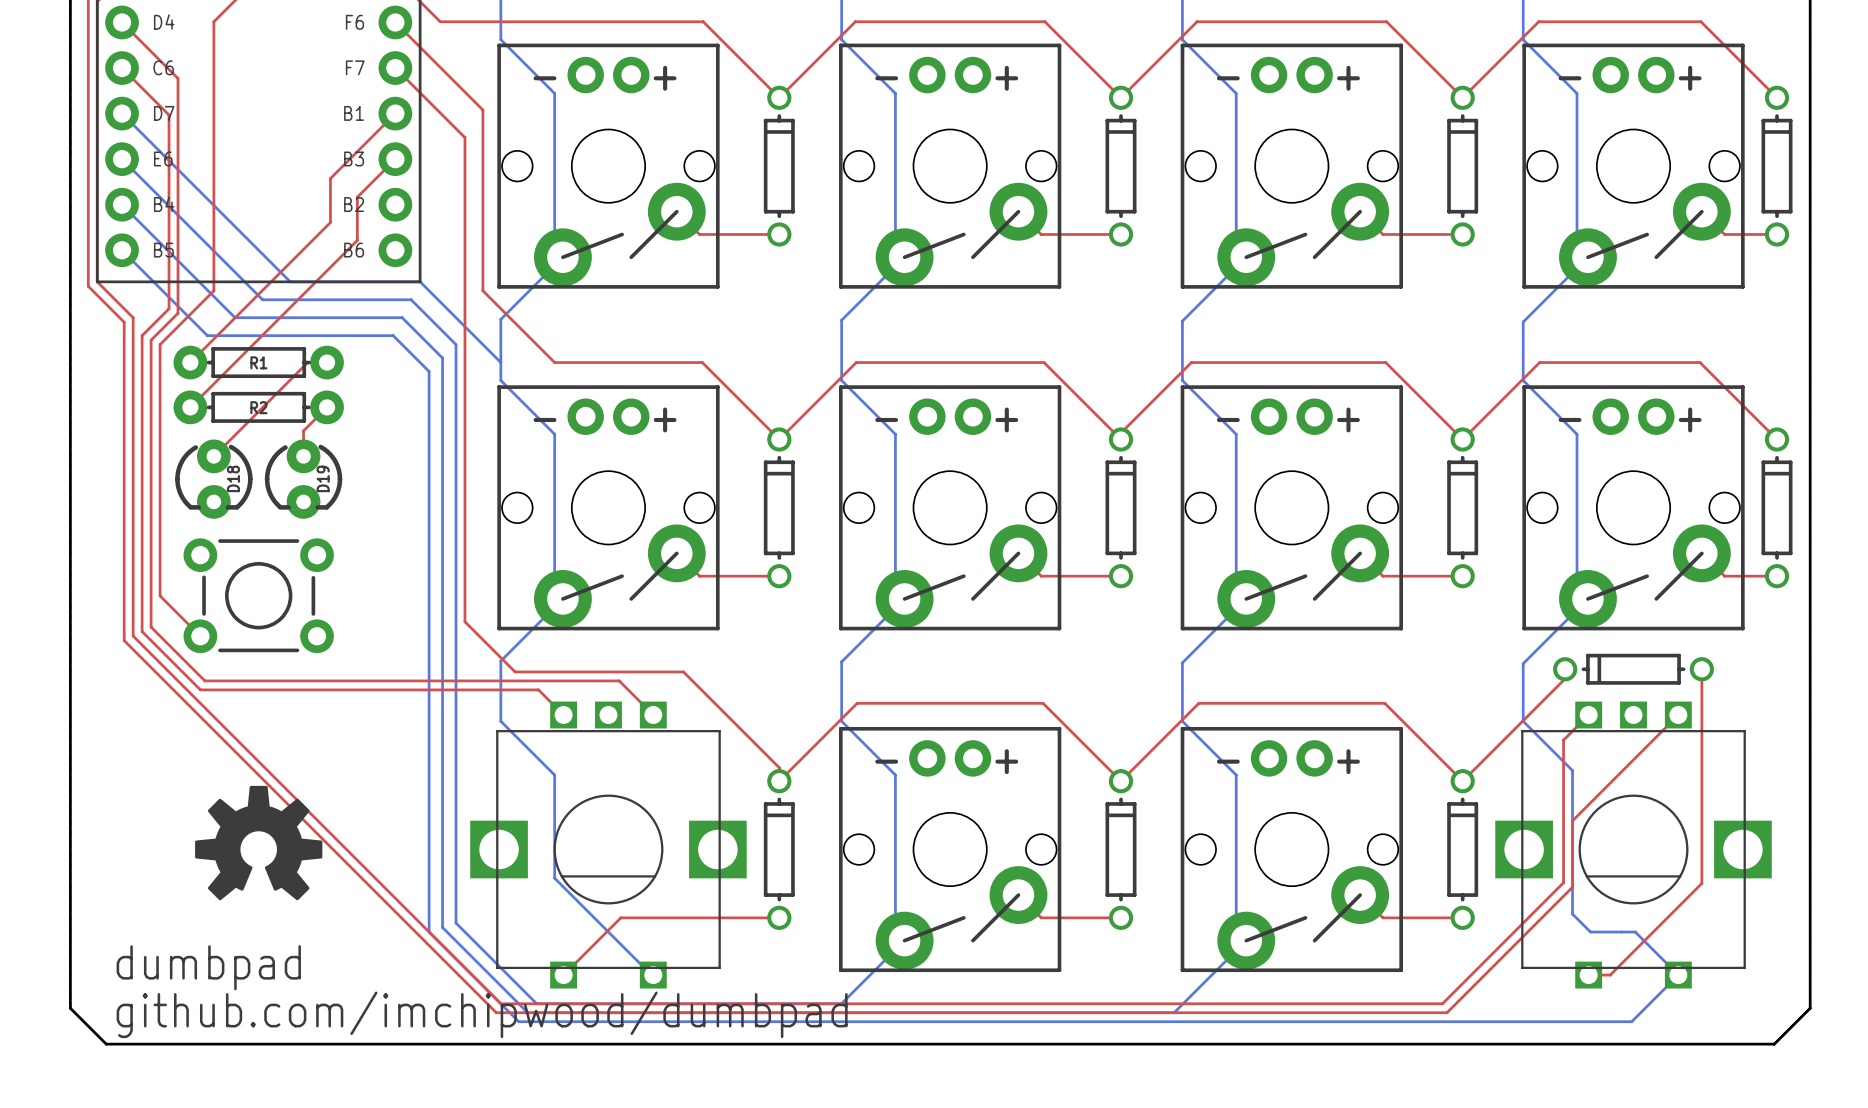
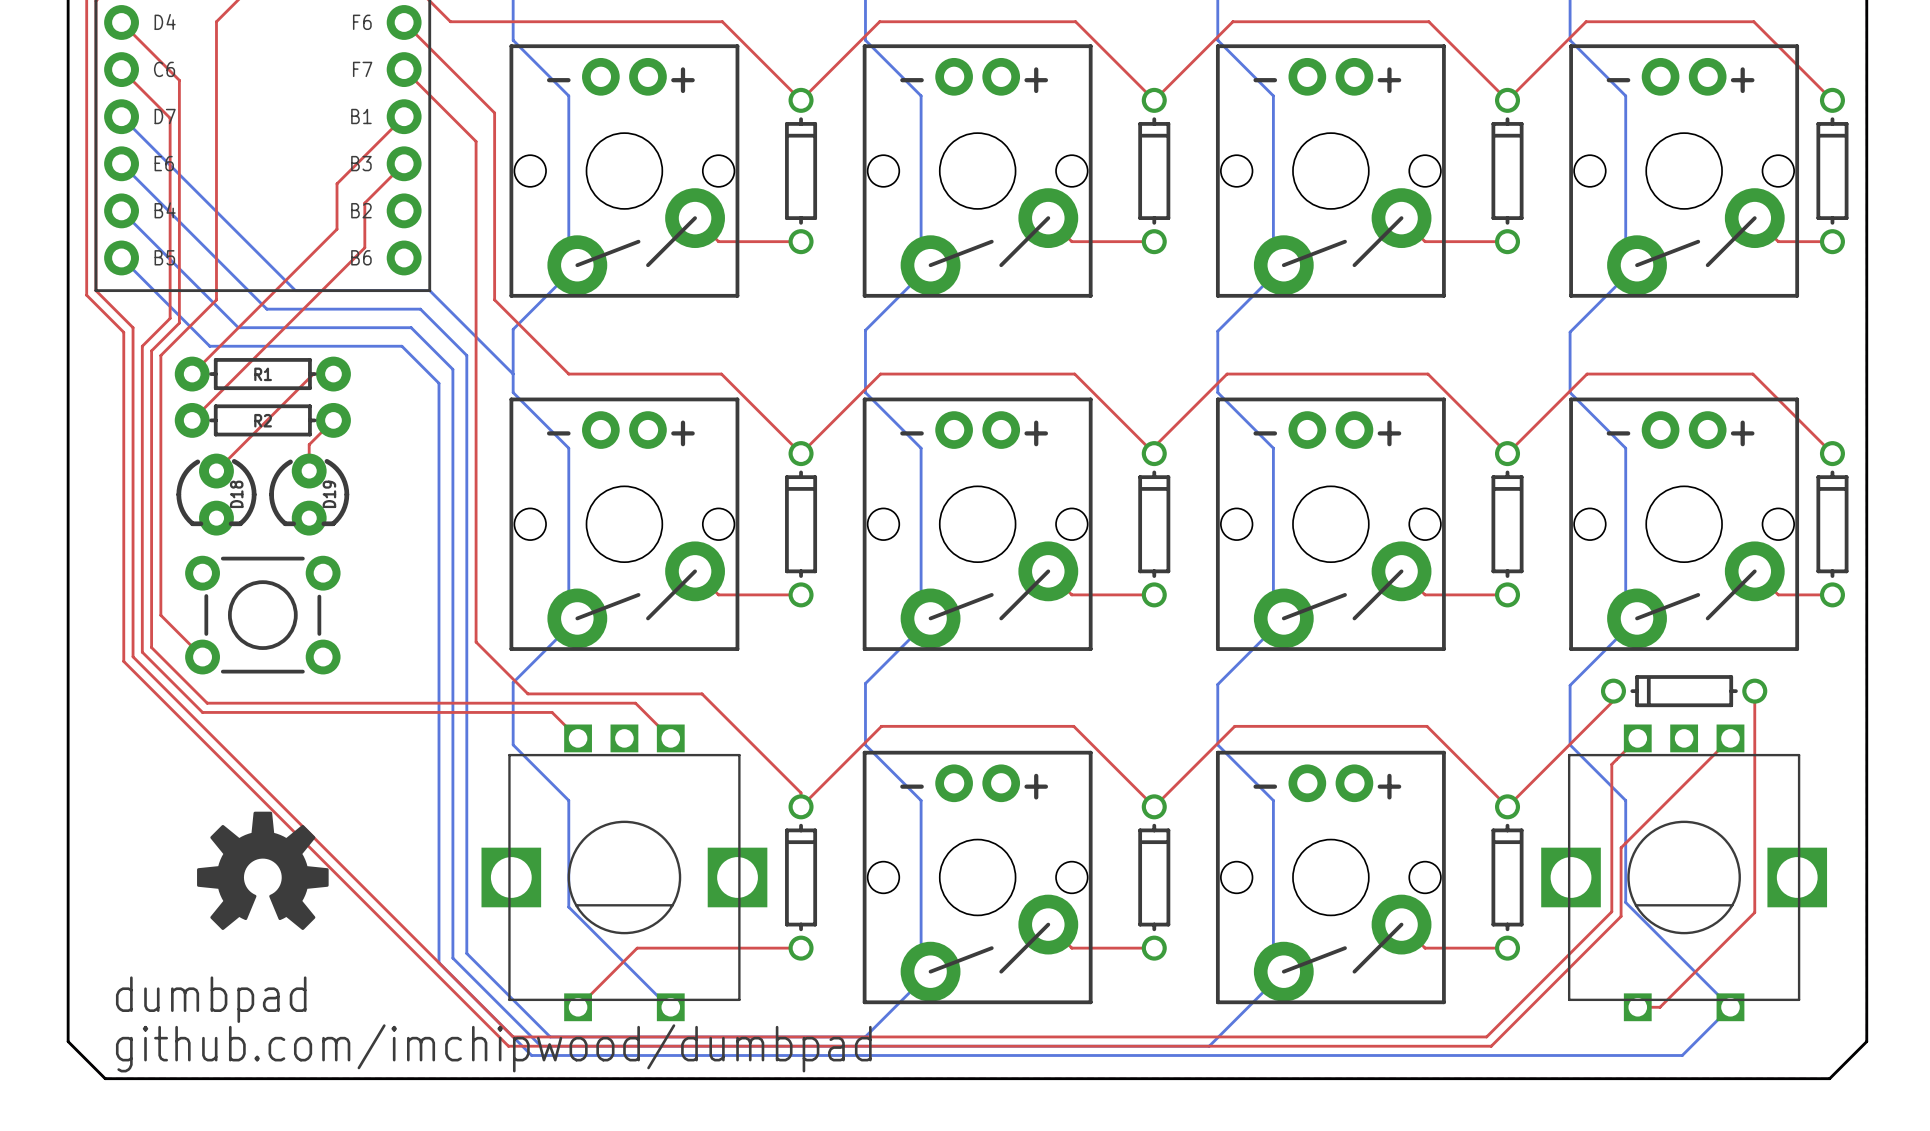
bottom track: (1572, 770) (1572, 914) (1590, 932) (1635, 932) -> (1621, 795) (1625, 800) (1625, 902) (1685, 962)

